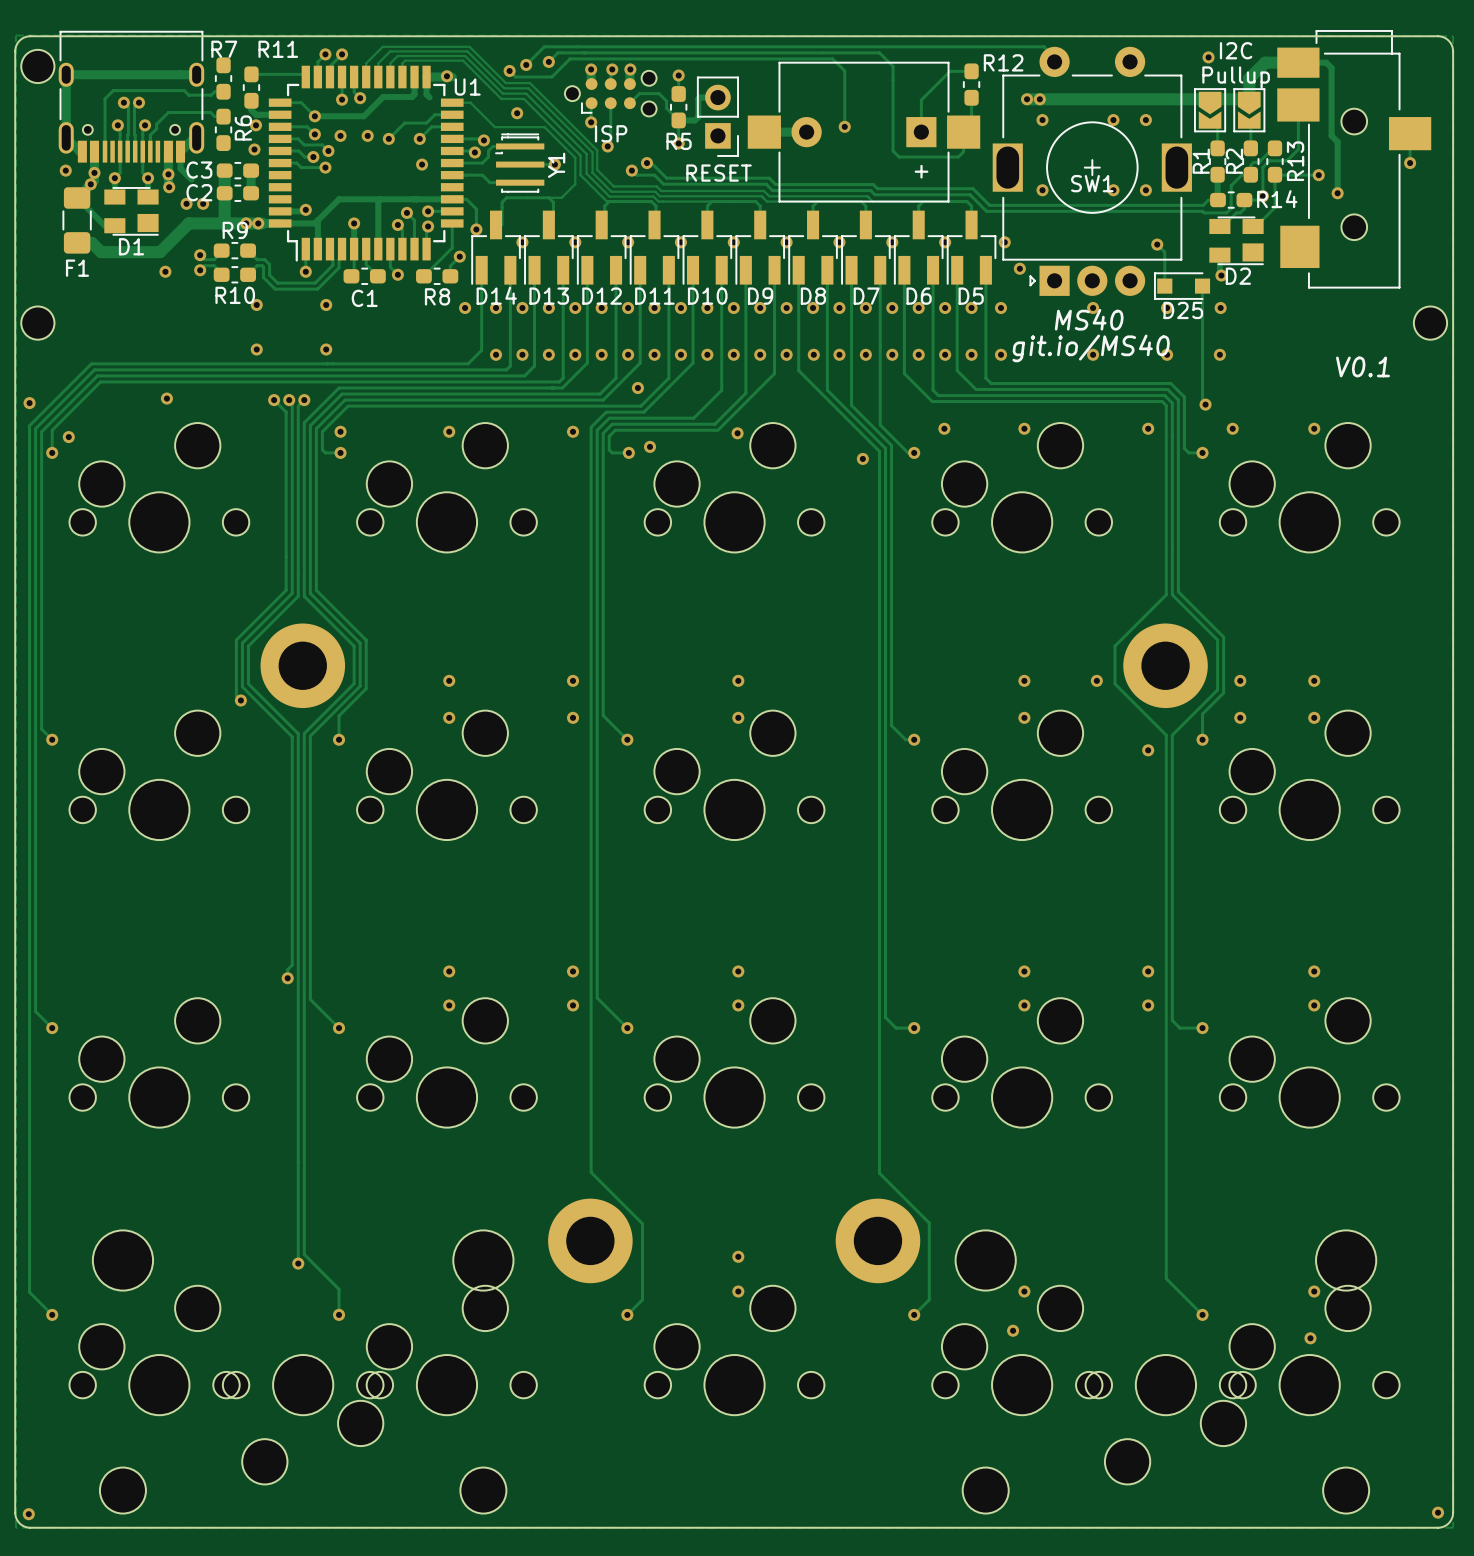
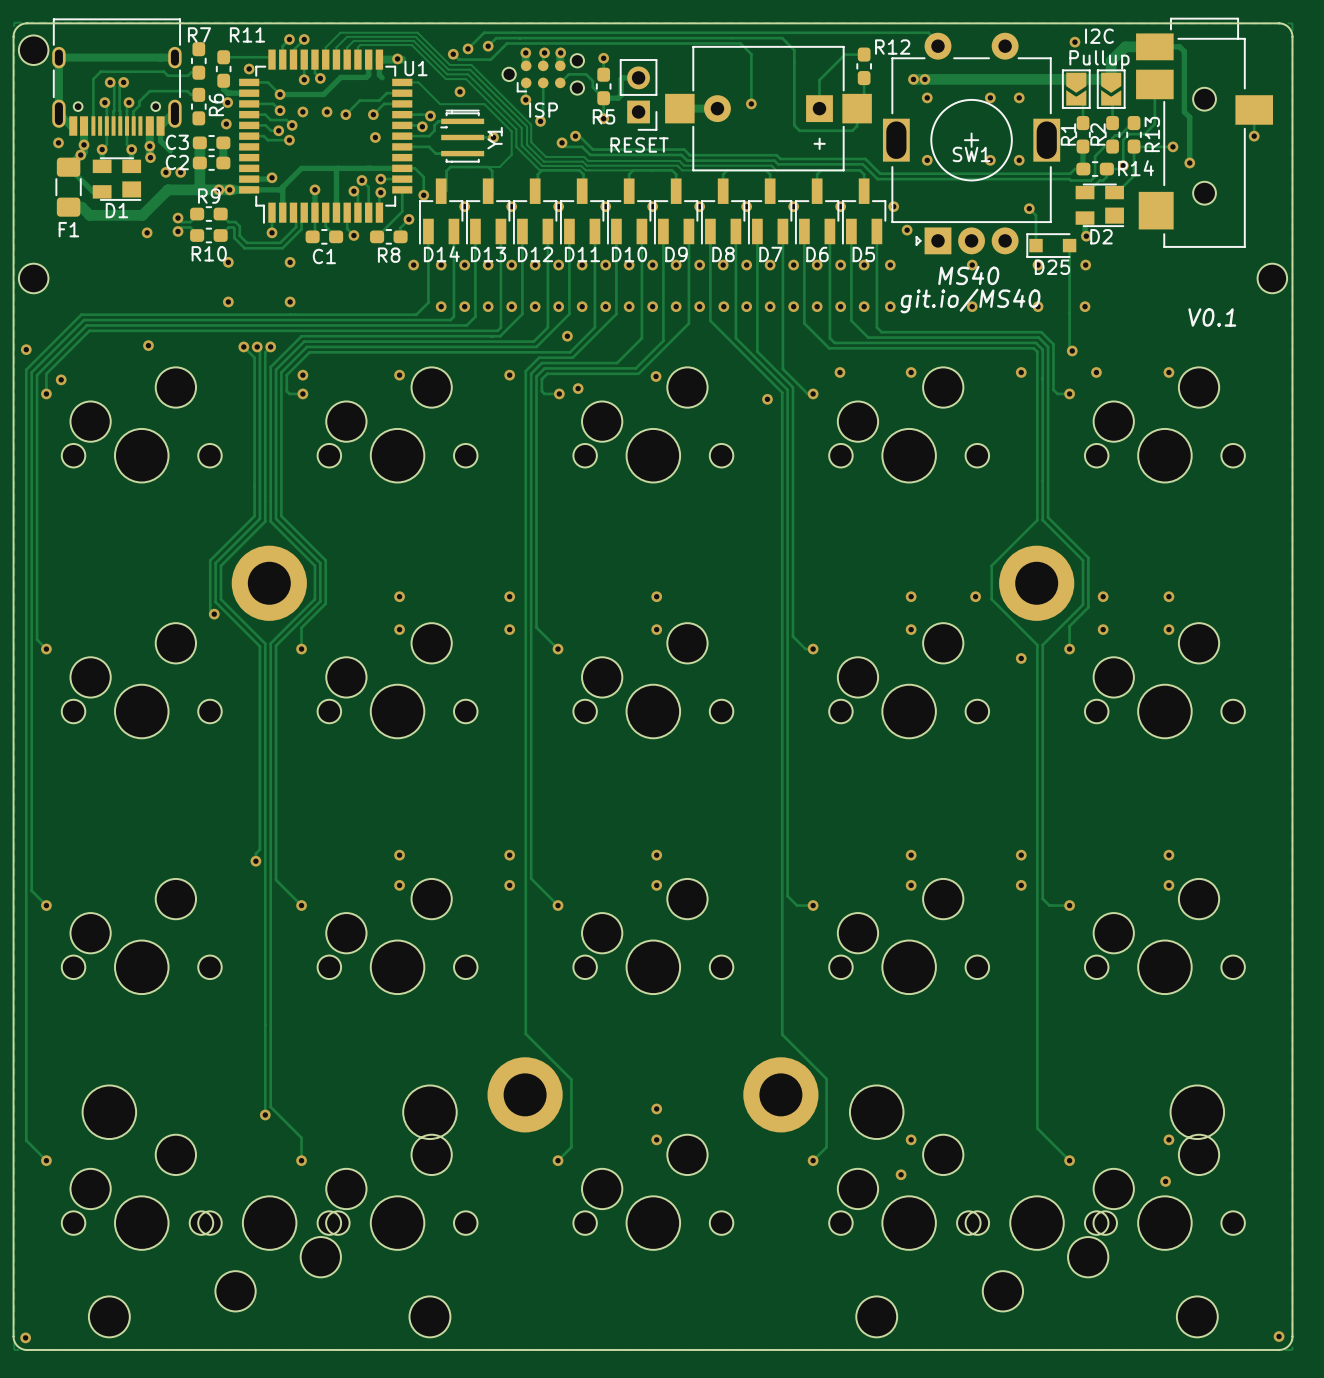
via: none -> (249, 69)

